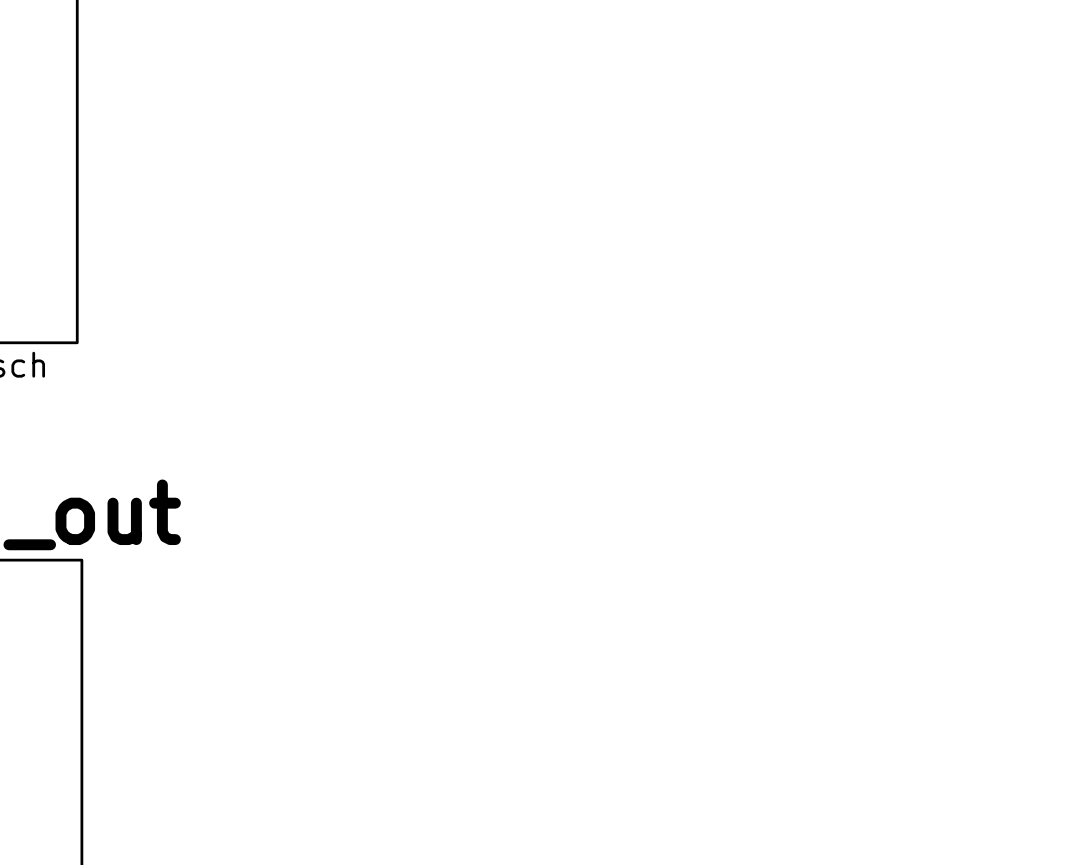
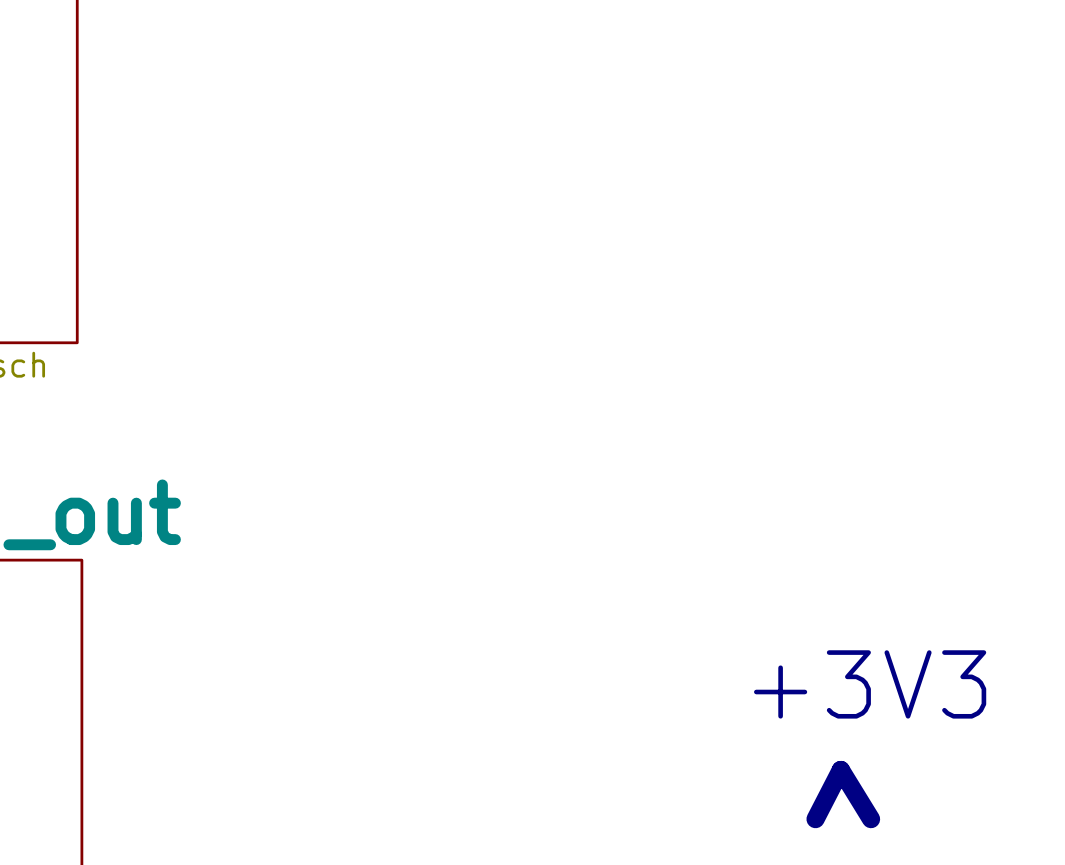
text: none -> +3V3 (870, 684)
line: none -> (815, 819) (840, 769) (871, 819)

